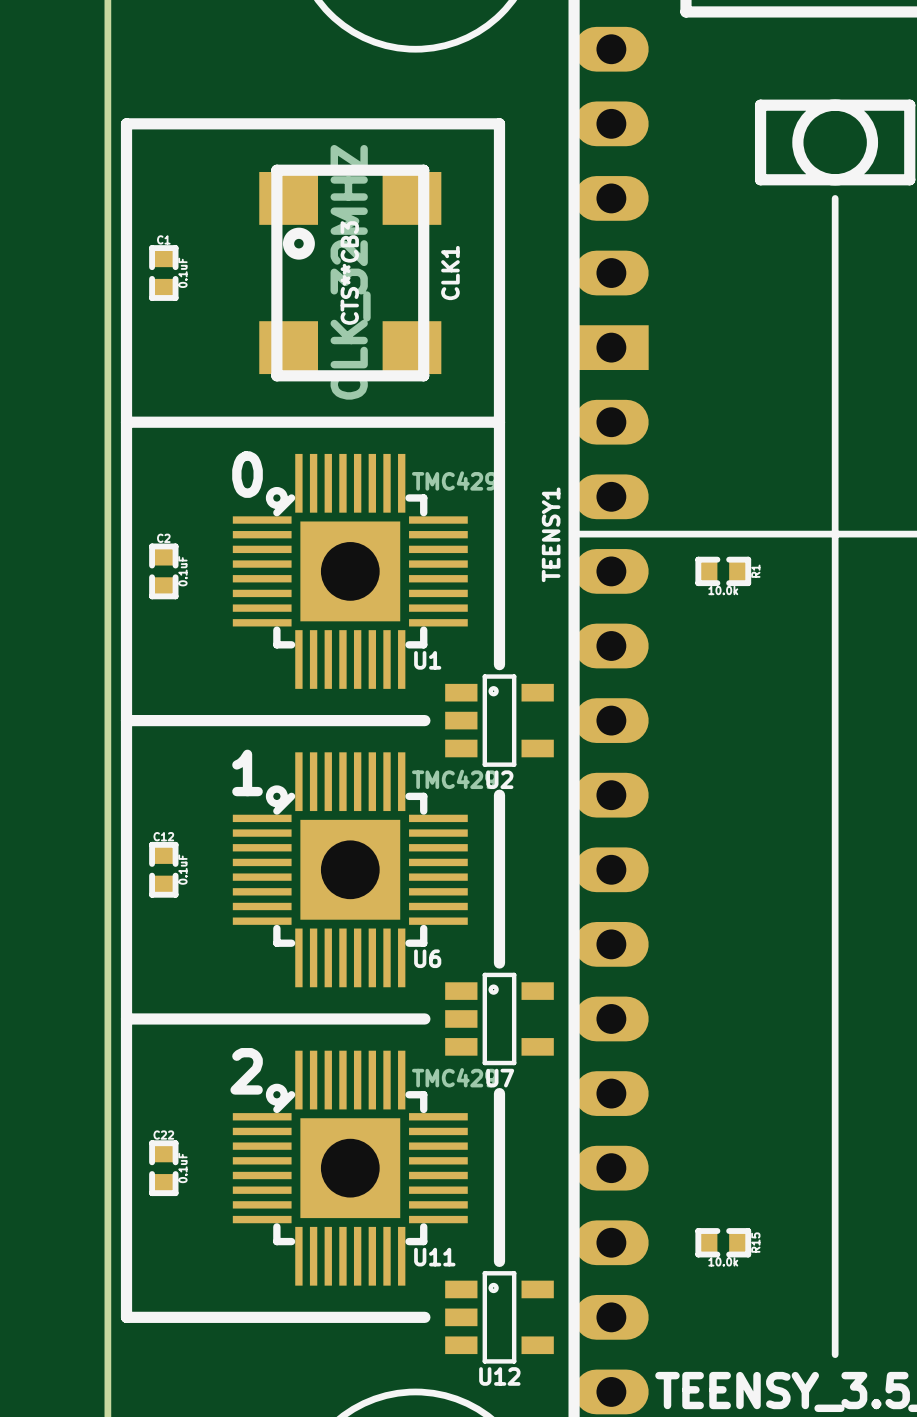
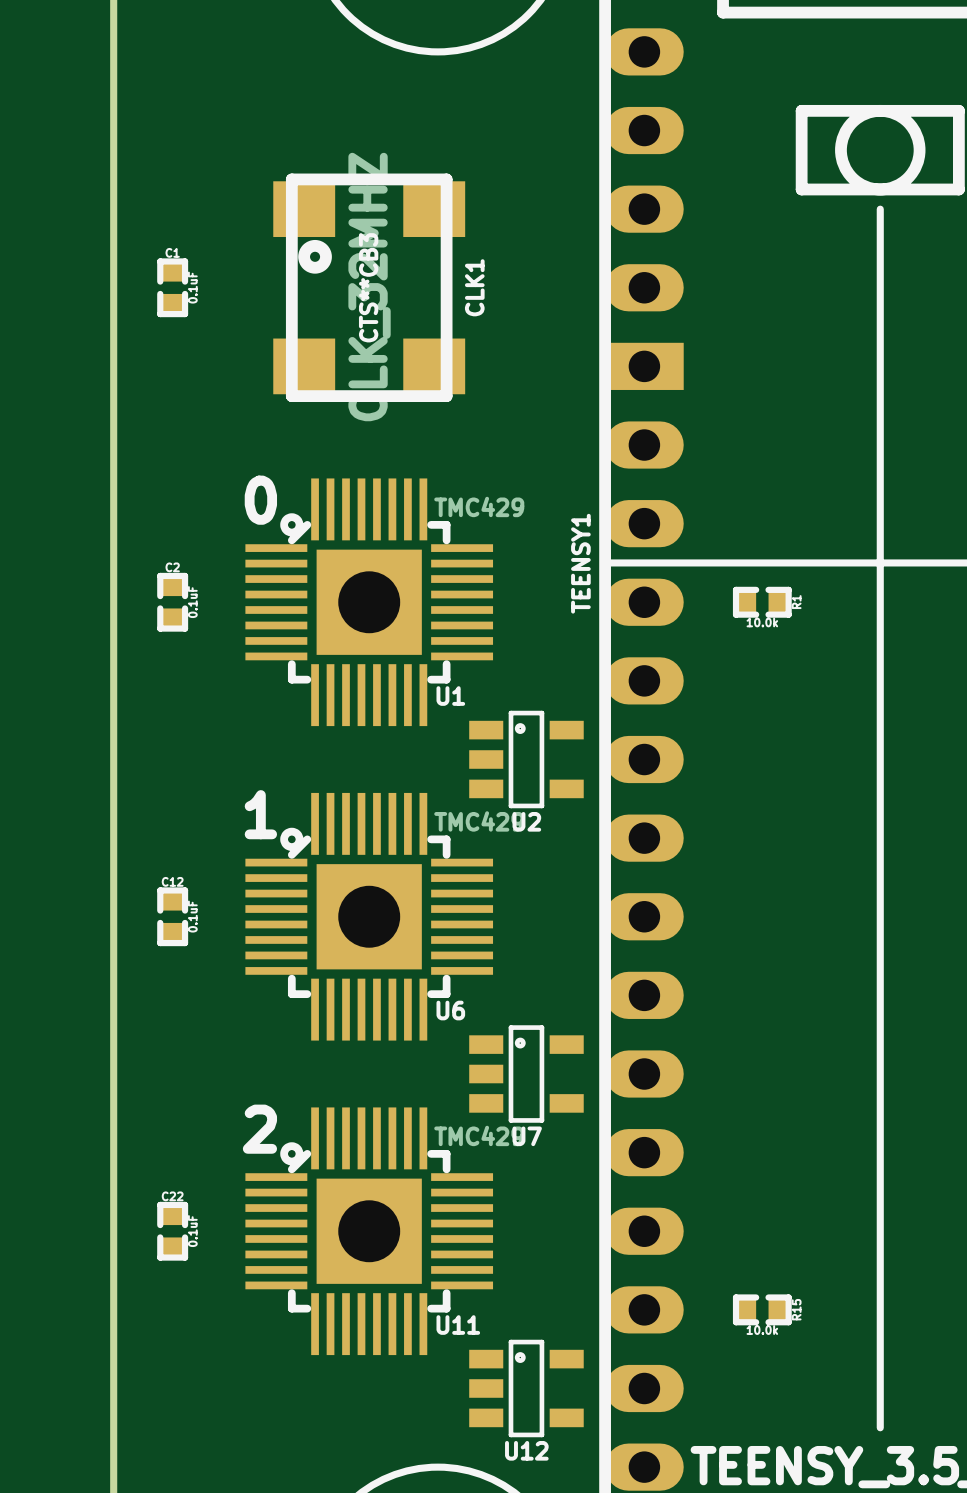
line: (126, 422) (499, 422) -> none
line: (499, 664) (499, 123) (126, 123) (126, 1317) (424, 1317) -> none
line: (126, 720) (424, 720) -> none
line: (499, 795) (499, 963) -> none
line: (126, 1018) (424, 1018) -> none
line: (499, 1093) (499, 1261) -> none

